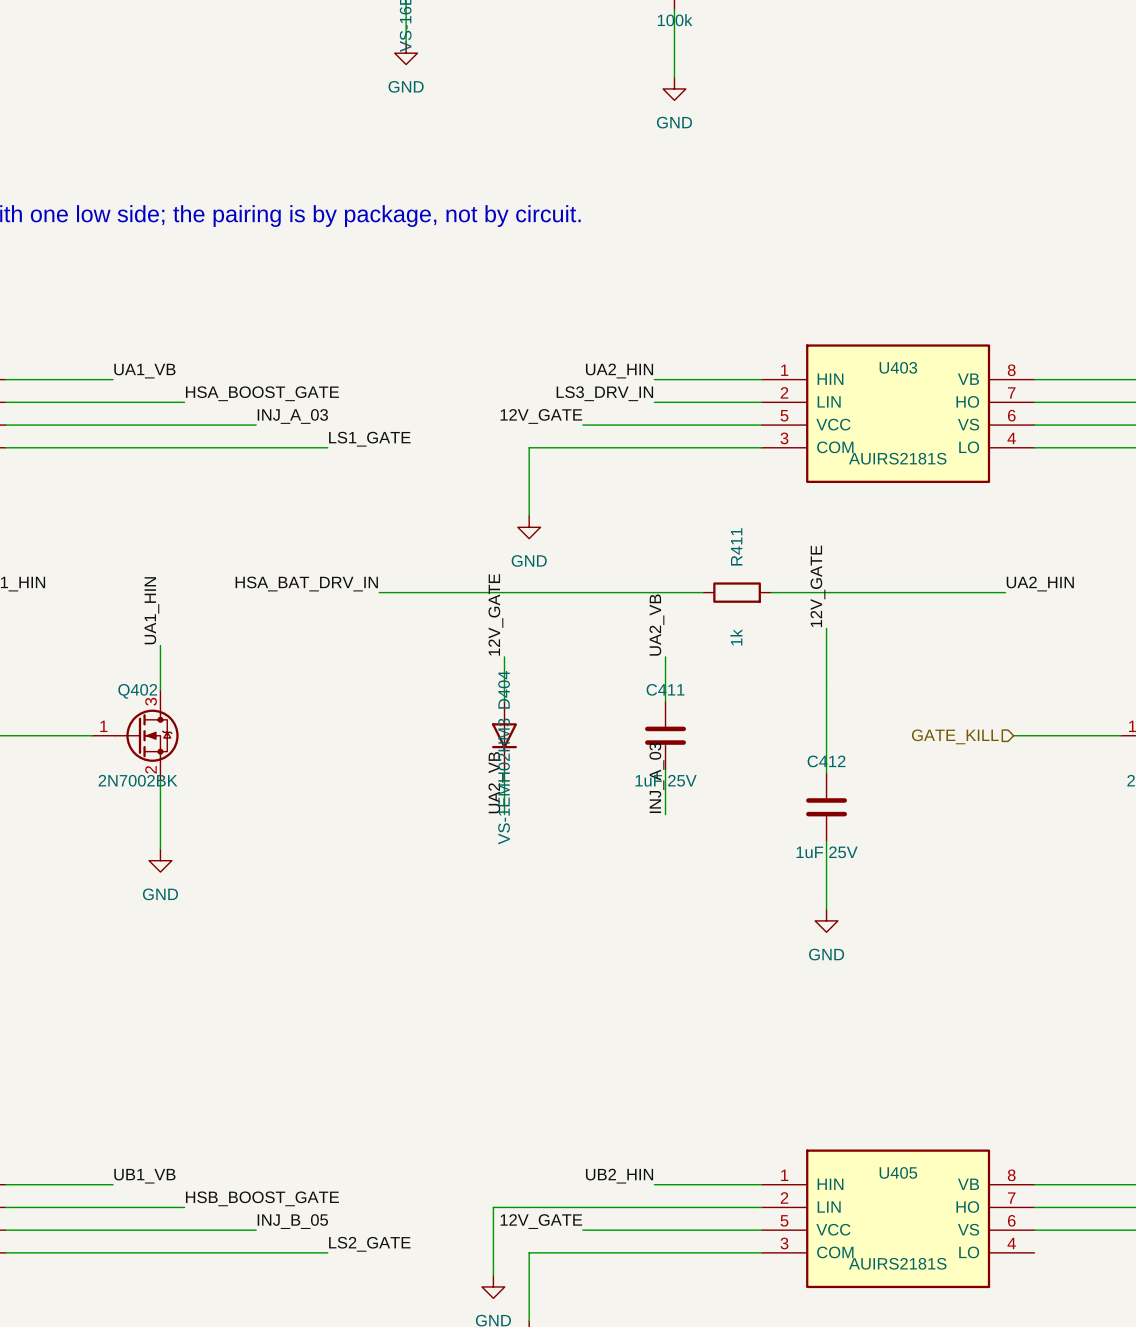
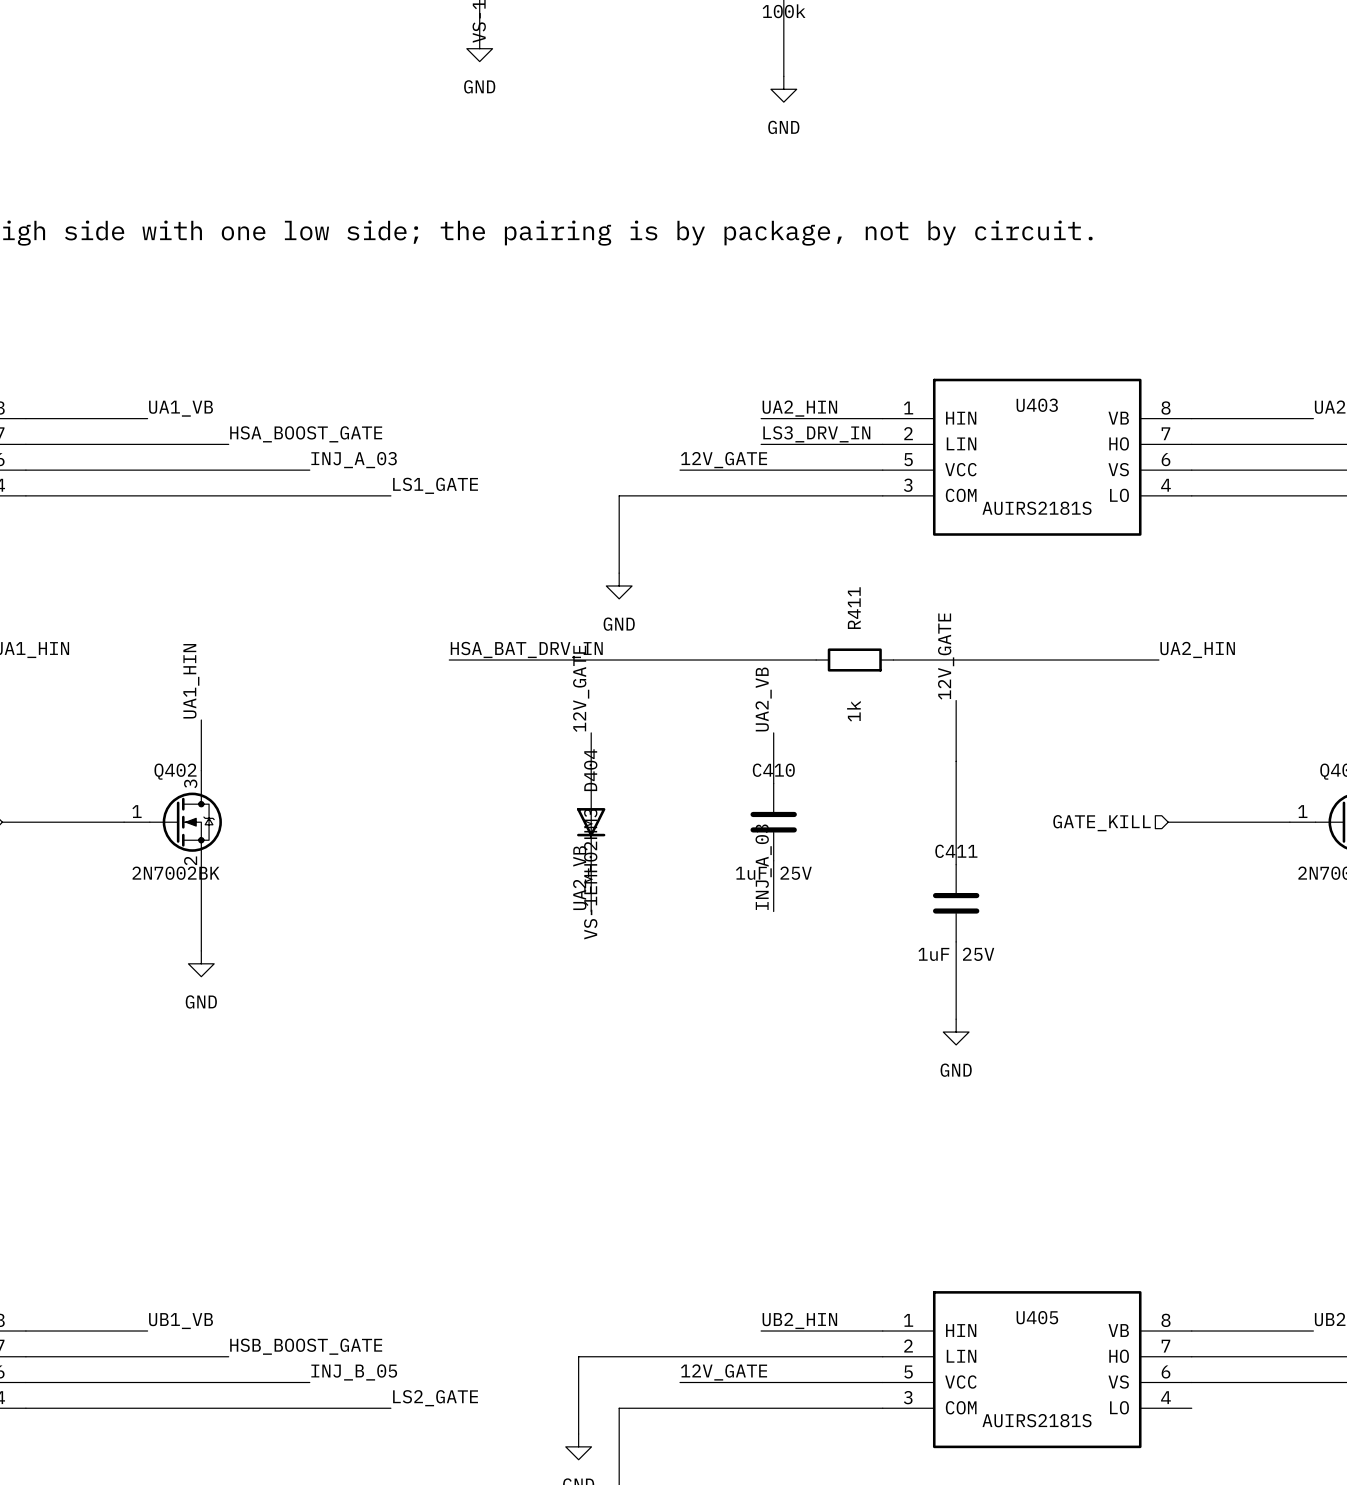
label position: UA2_HIN (619, 371) -> UA2_HIN (799, 408)
label position: LS3_DRV_IN (604, 393) -> LS3_DRV_IN (816, 434)
label position: 12V_GATE (541, 416) -> 12V_GATE (724, 460)
label position: HSA_BAT_DRV_IN (306, 584) -> HSA_BAT_DRV_IN (526, 649)
C411 name: C411 (665, 689) -> C410 (773, 770)
C412 name: C412 (826, 761) -> C411 (956, 851)
label position: UB2_HIN (619, 1176) -> UB2_HIN (799, 1320)
label position: 12V_GATE (541, 1221) -> 12V_GATE (724, 1372)

